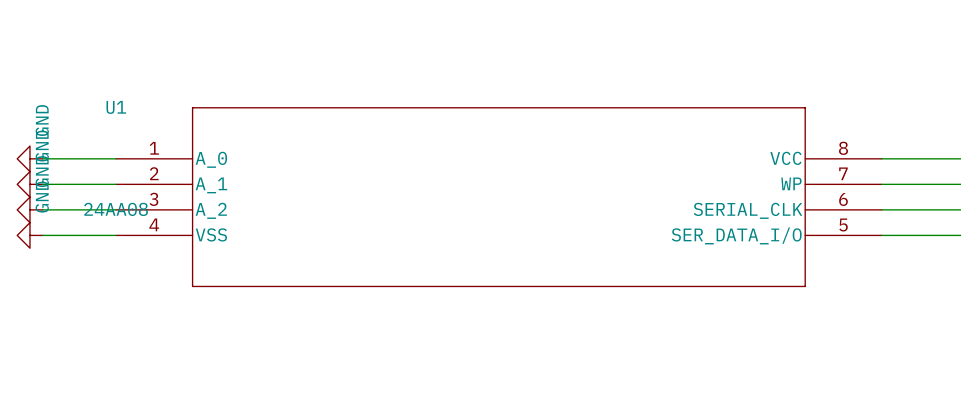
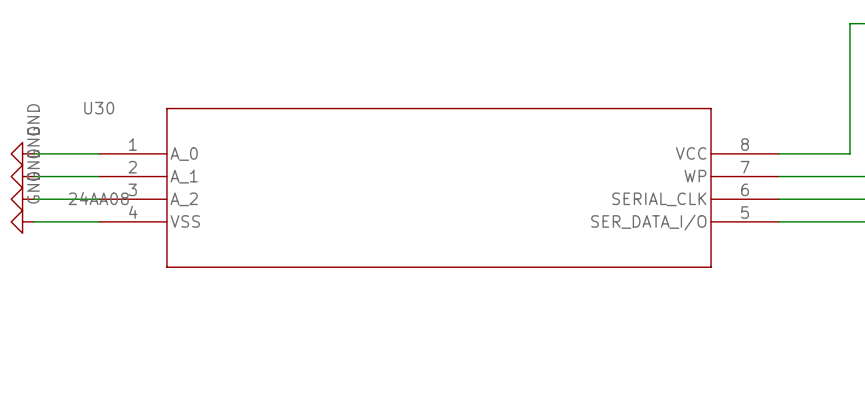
U1 name: U1 (116, 107) -> U30 (99, 108)

